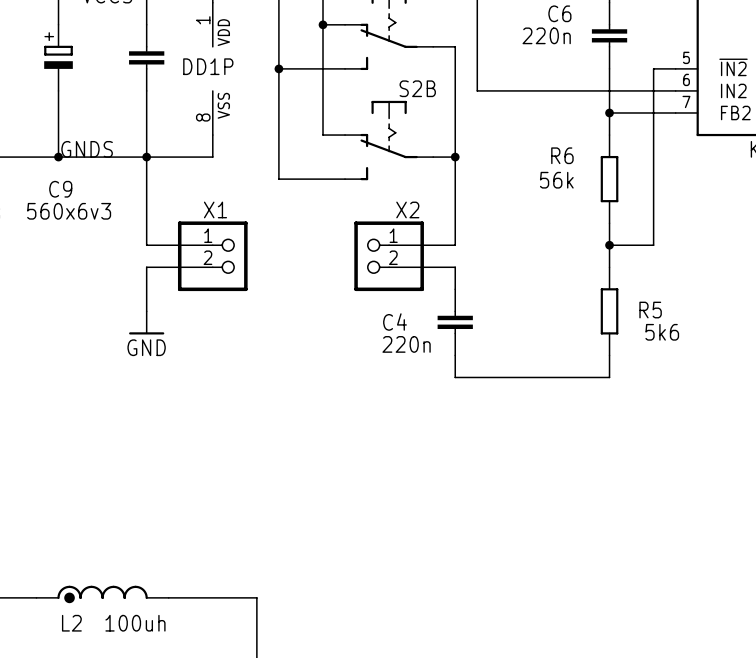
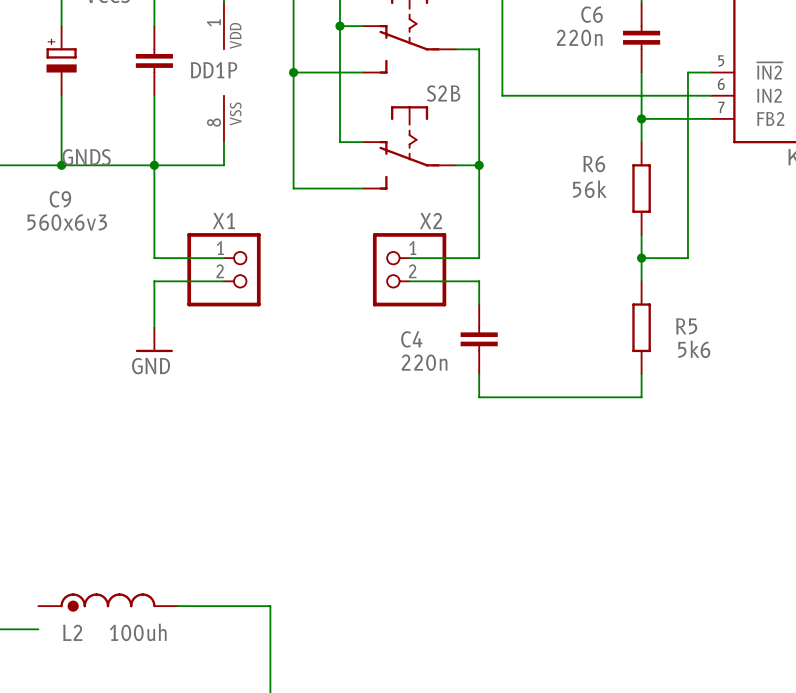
L2 position: (102, 592) -> (107, 600)
drawing position: (69, 597) -> (73, 606)
wire: (168, 597) (256, 597) -> (177, 606) (270, 606) (270, 629)

